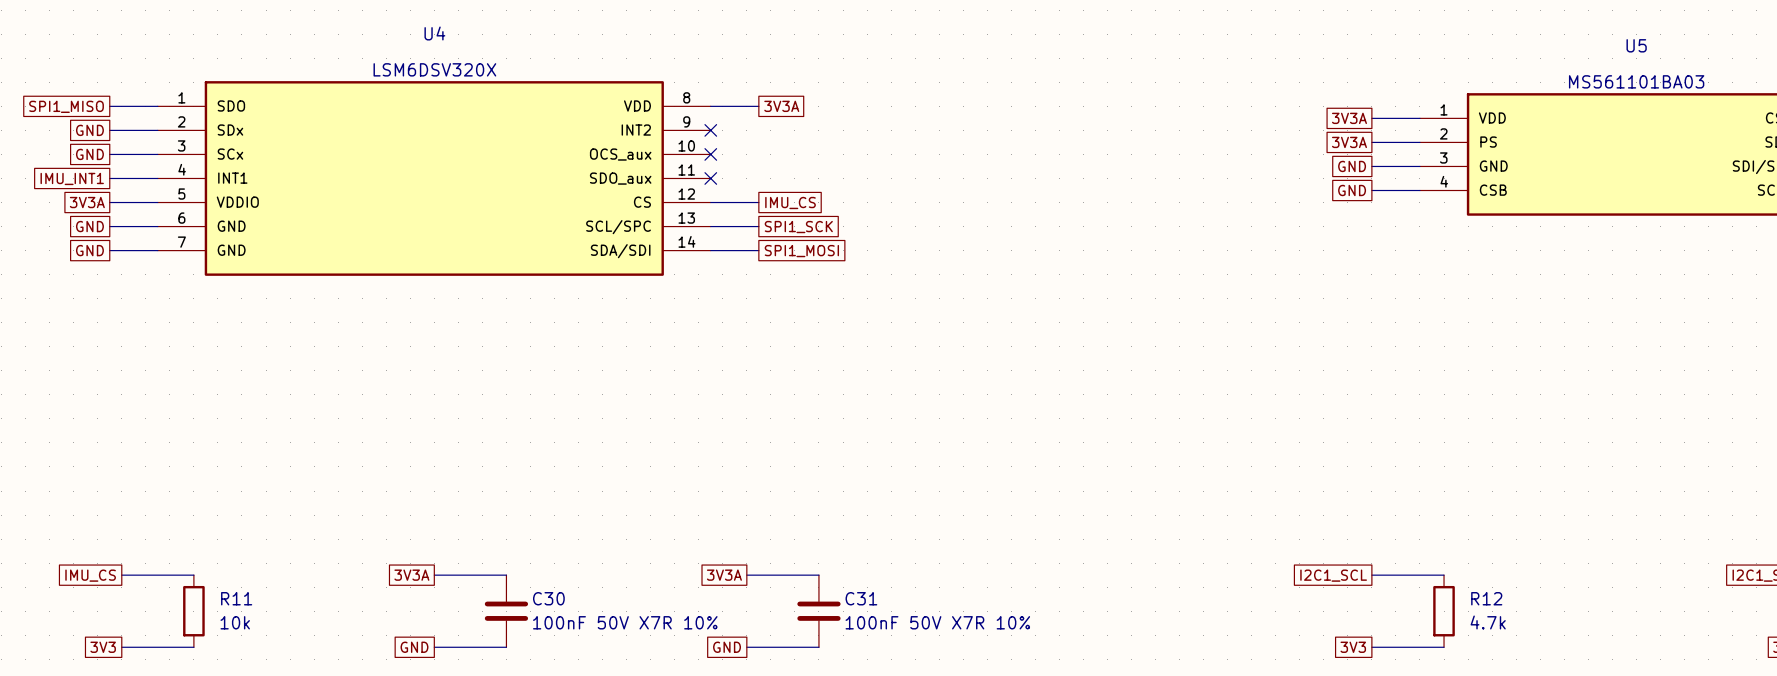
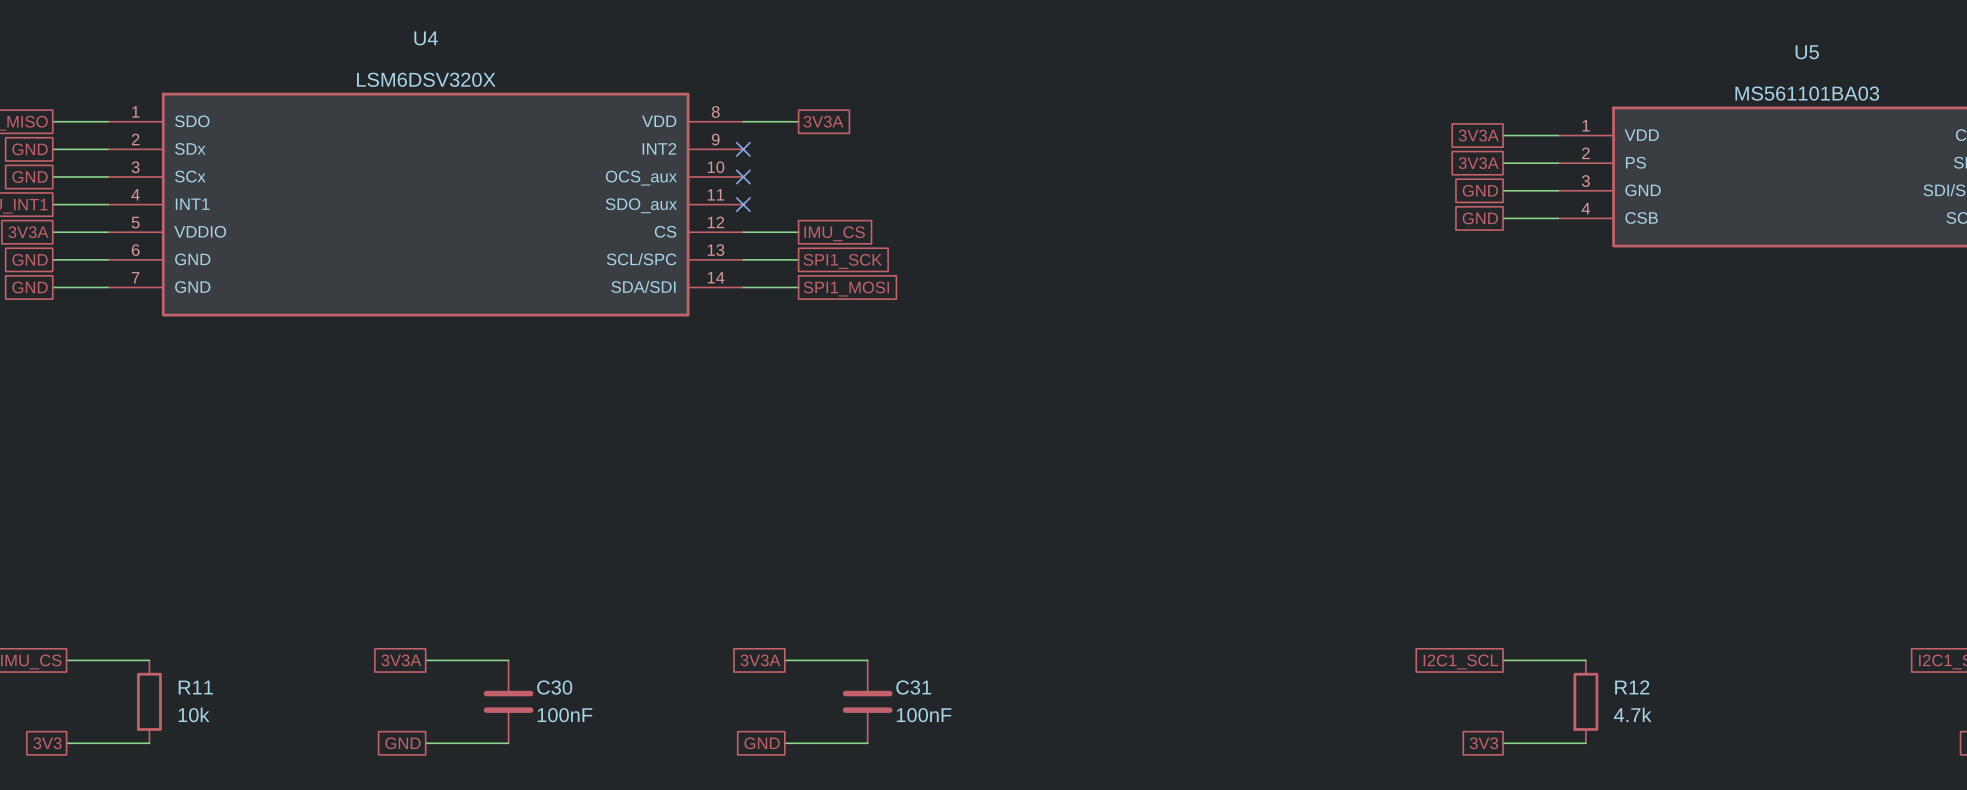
C30 value: 100nF 50V X7R 10% (625, 622) -> 100nF (565, 715)
C31 value: 100nF 50V X7R 10% (937, 622) -> 100nF (924, 715)

